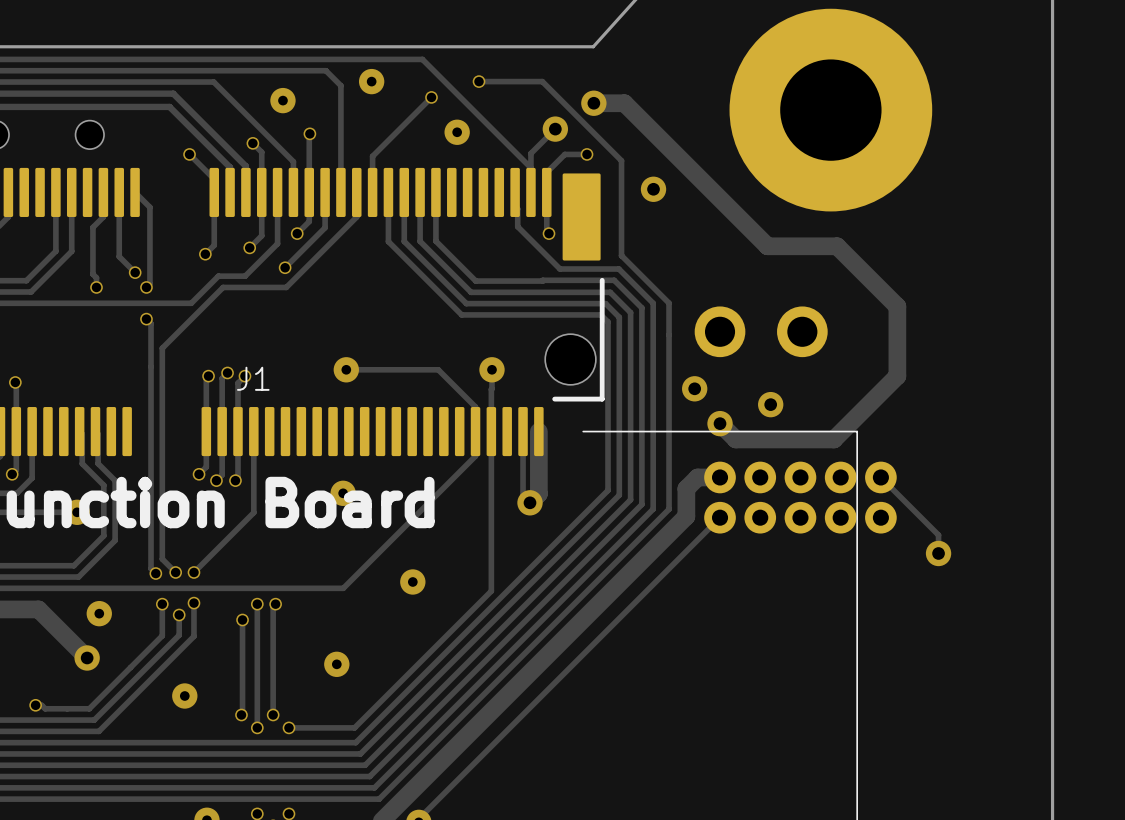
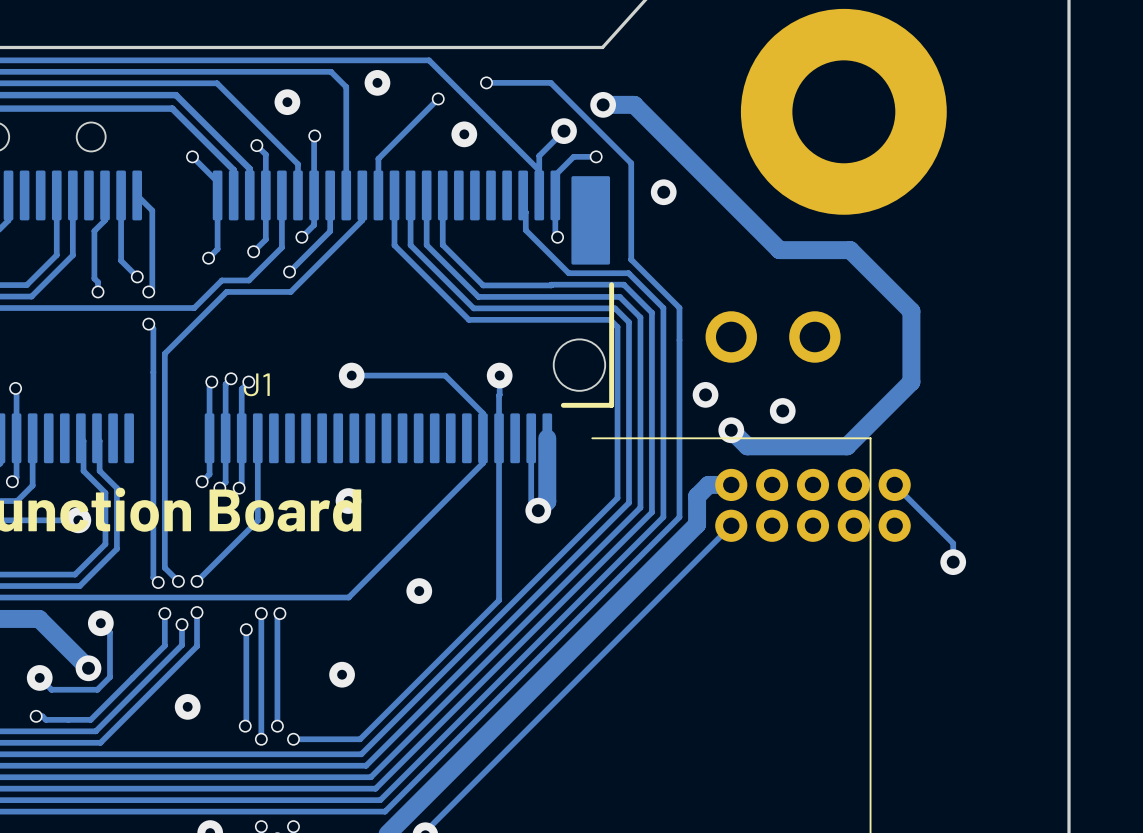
track: none -> (100, 623) (109, 632) (109, 677) (97, 689) (51, 689) (39, 677)
via: none -> (39, 677)

